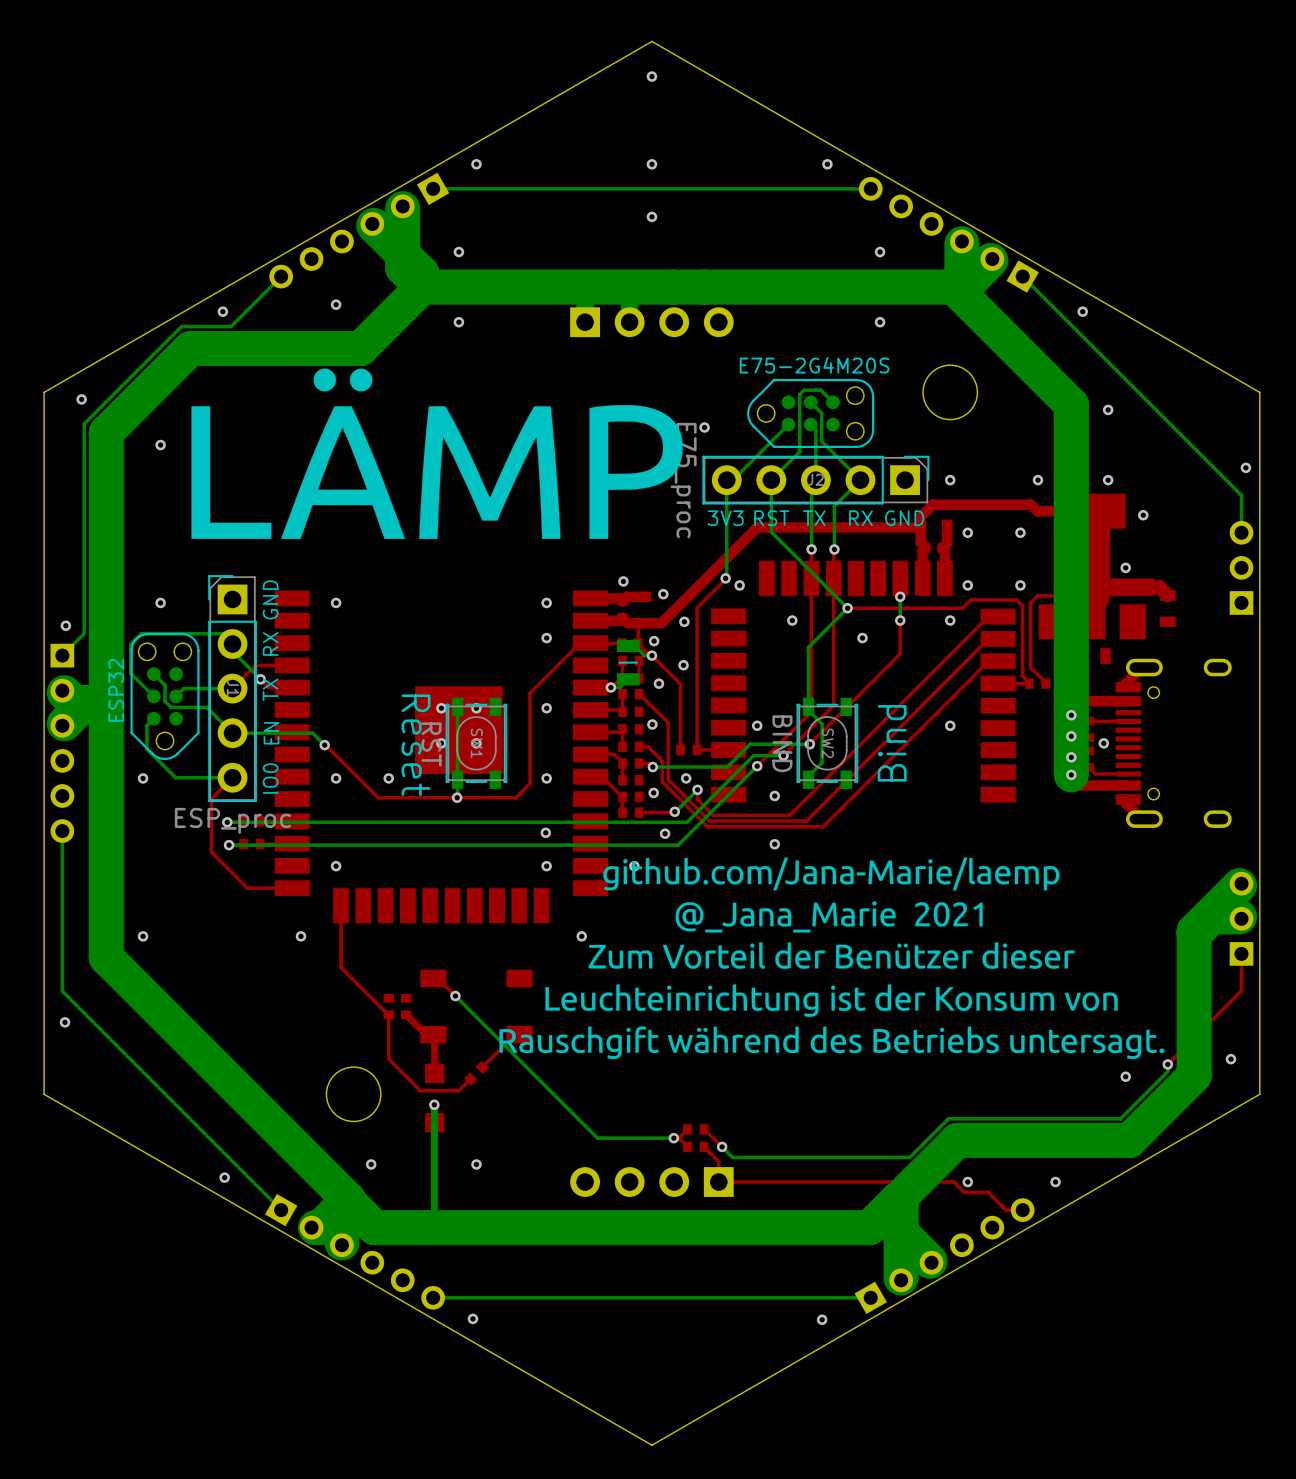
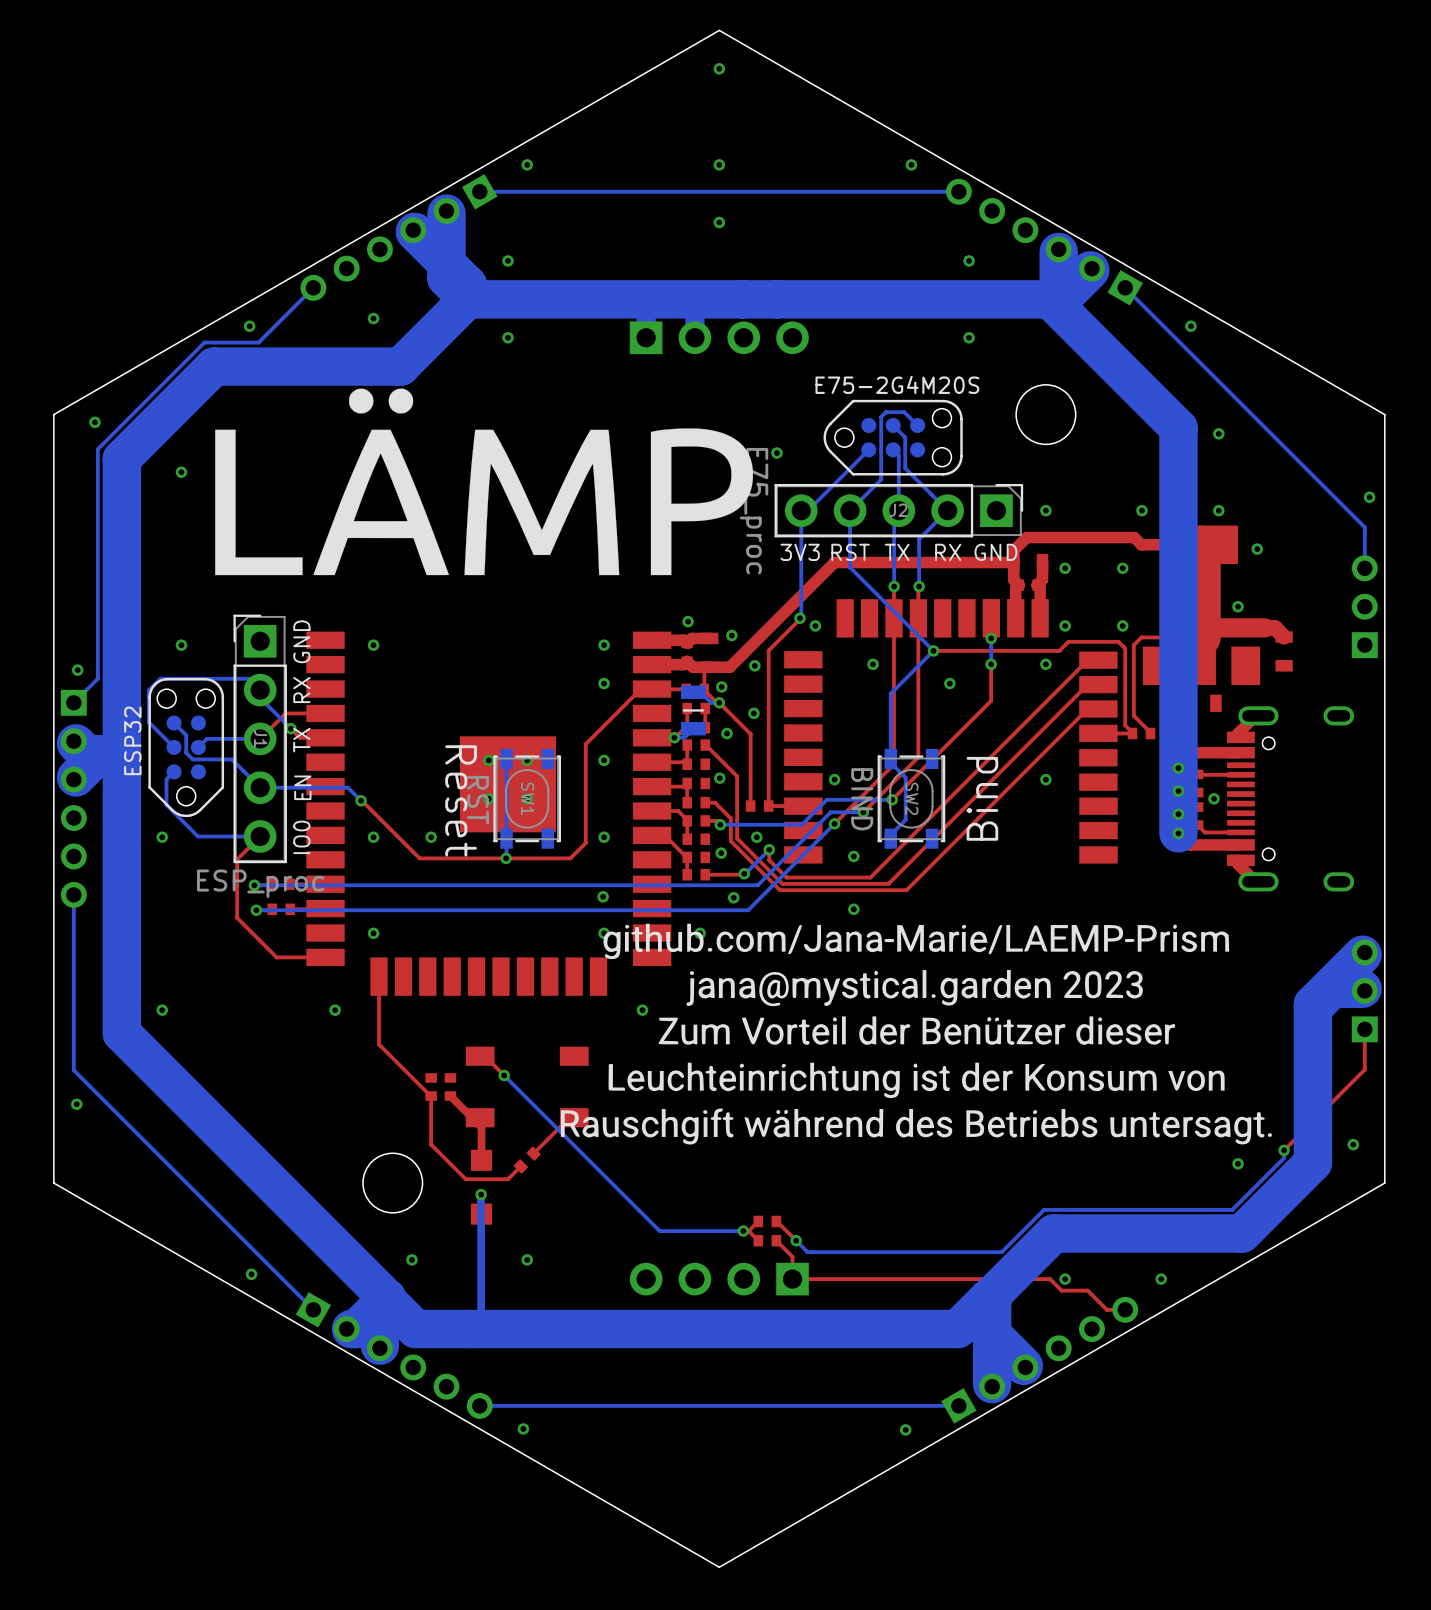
drawing shape: [499, 857, 1165, 1060] -> [560, 923, 1272, 1145]

